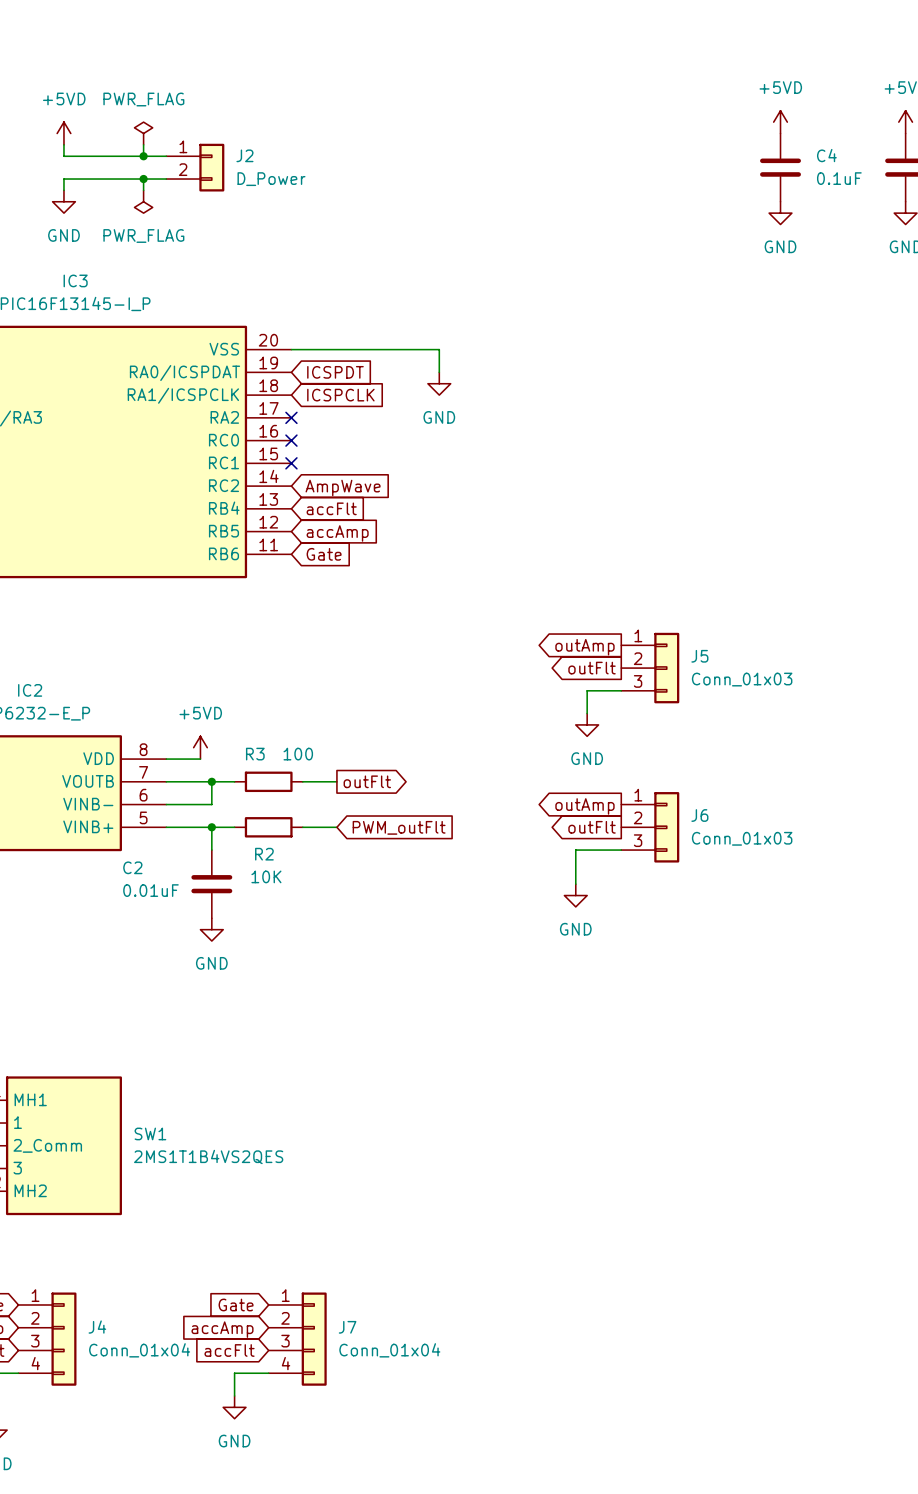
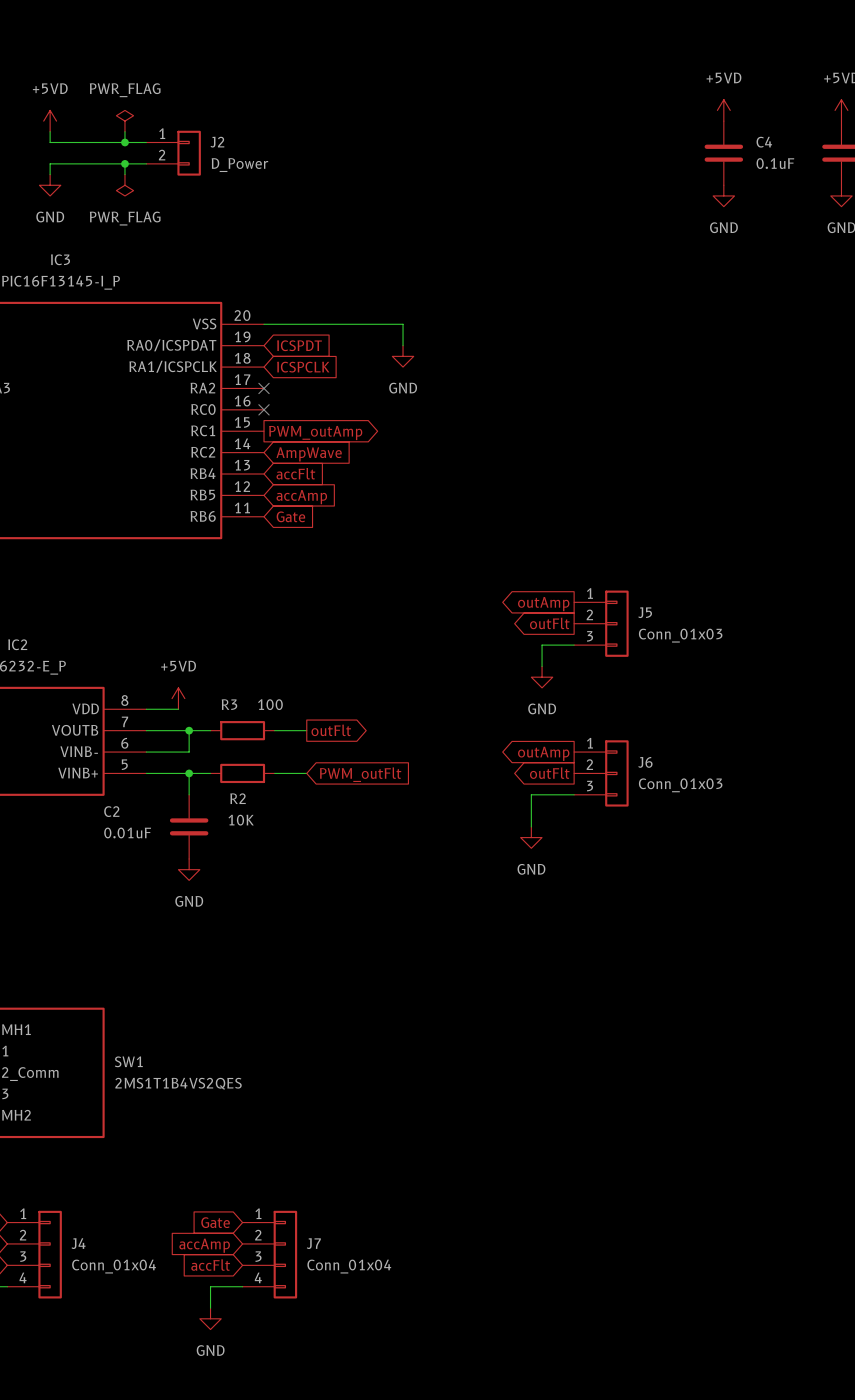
no-connect mark: (291, 463) -> none
global label: none -> PWM_outAmp (315, 432)

